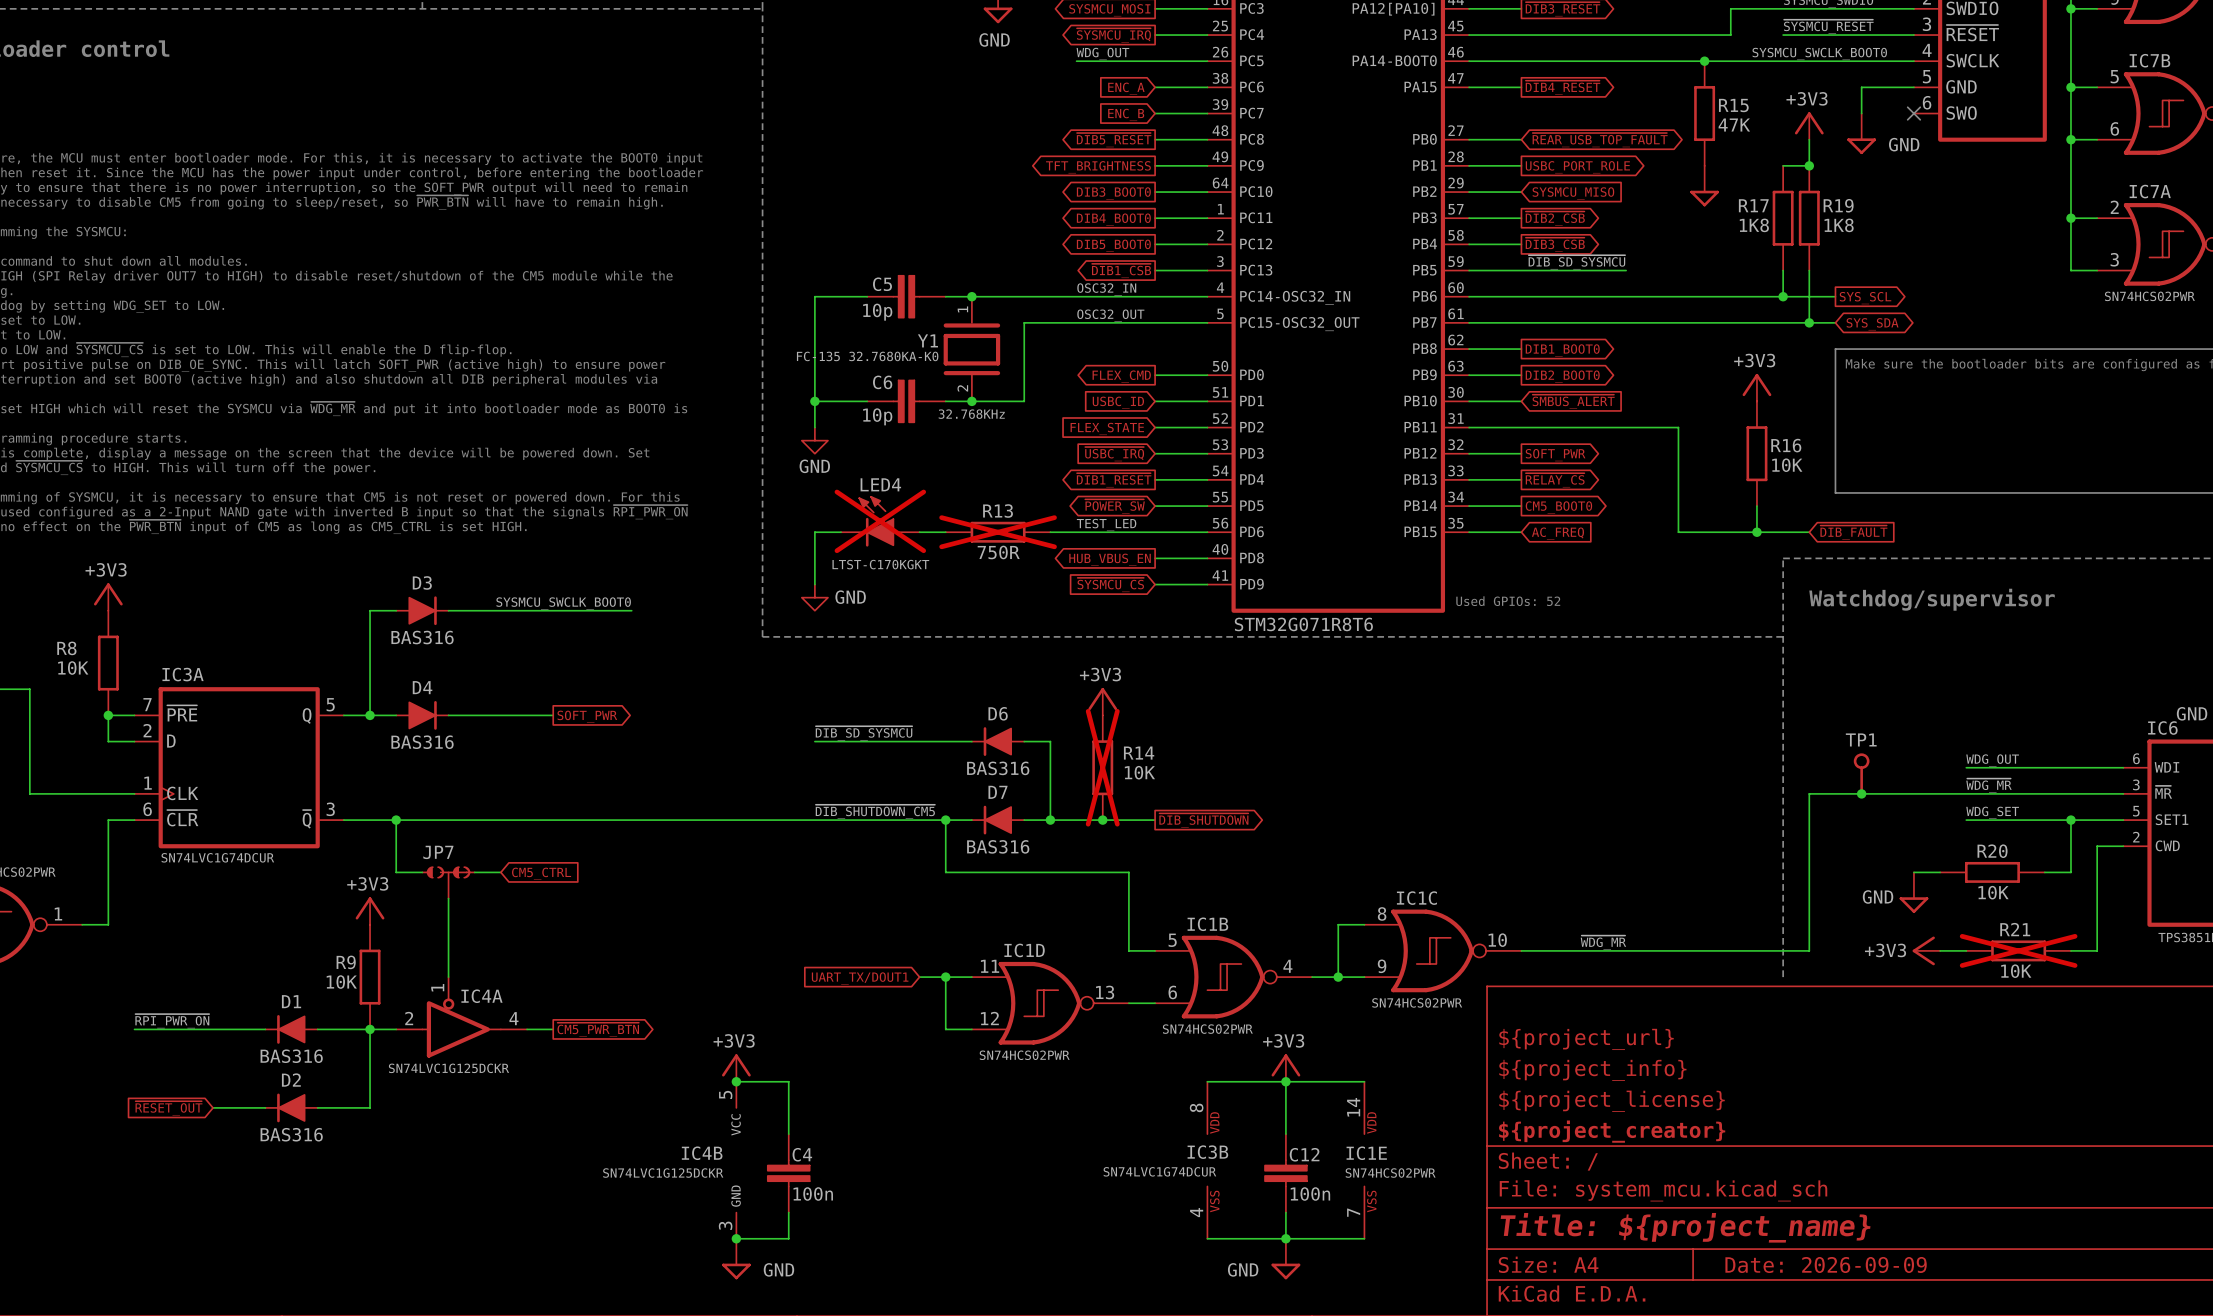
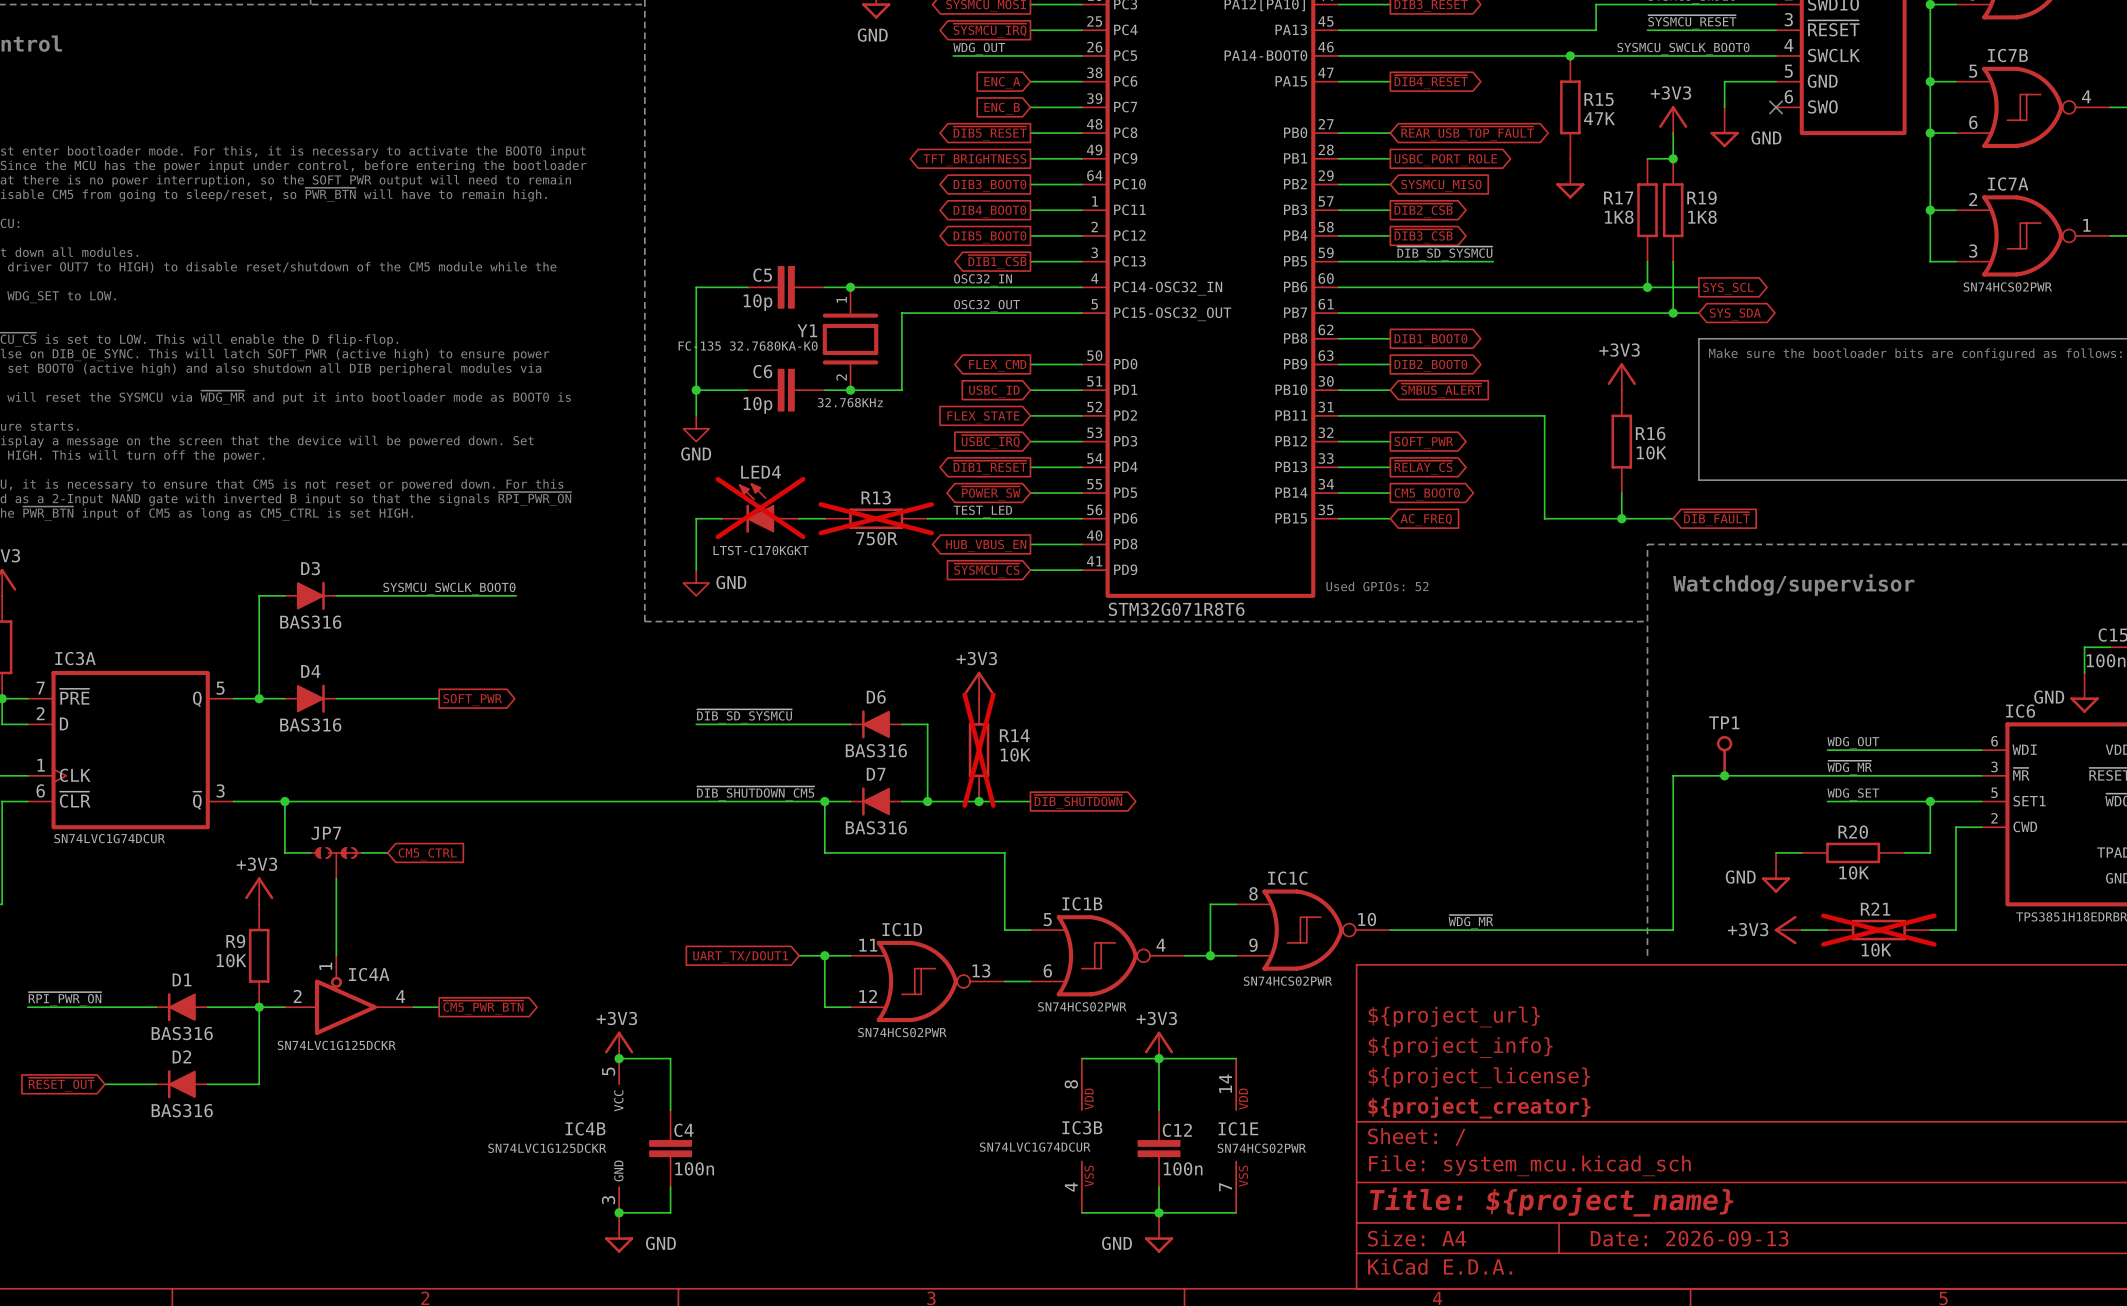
title block: Date: 2026-09-09 (1826, 1264) -> Date: 2026-09-13 (1689, 1238)

